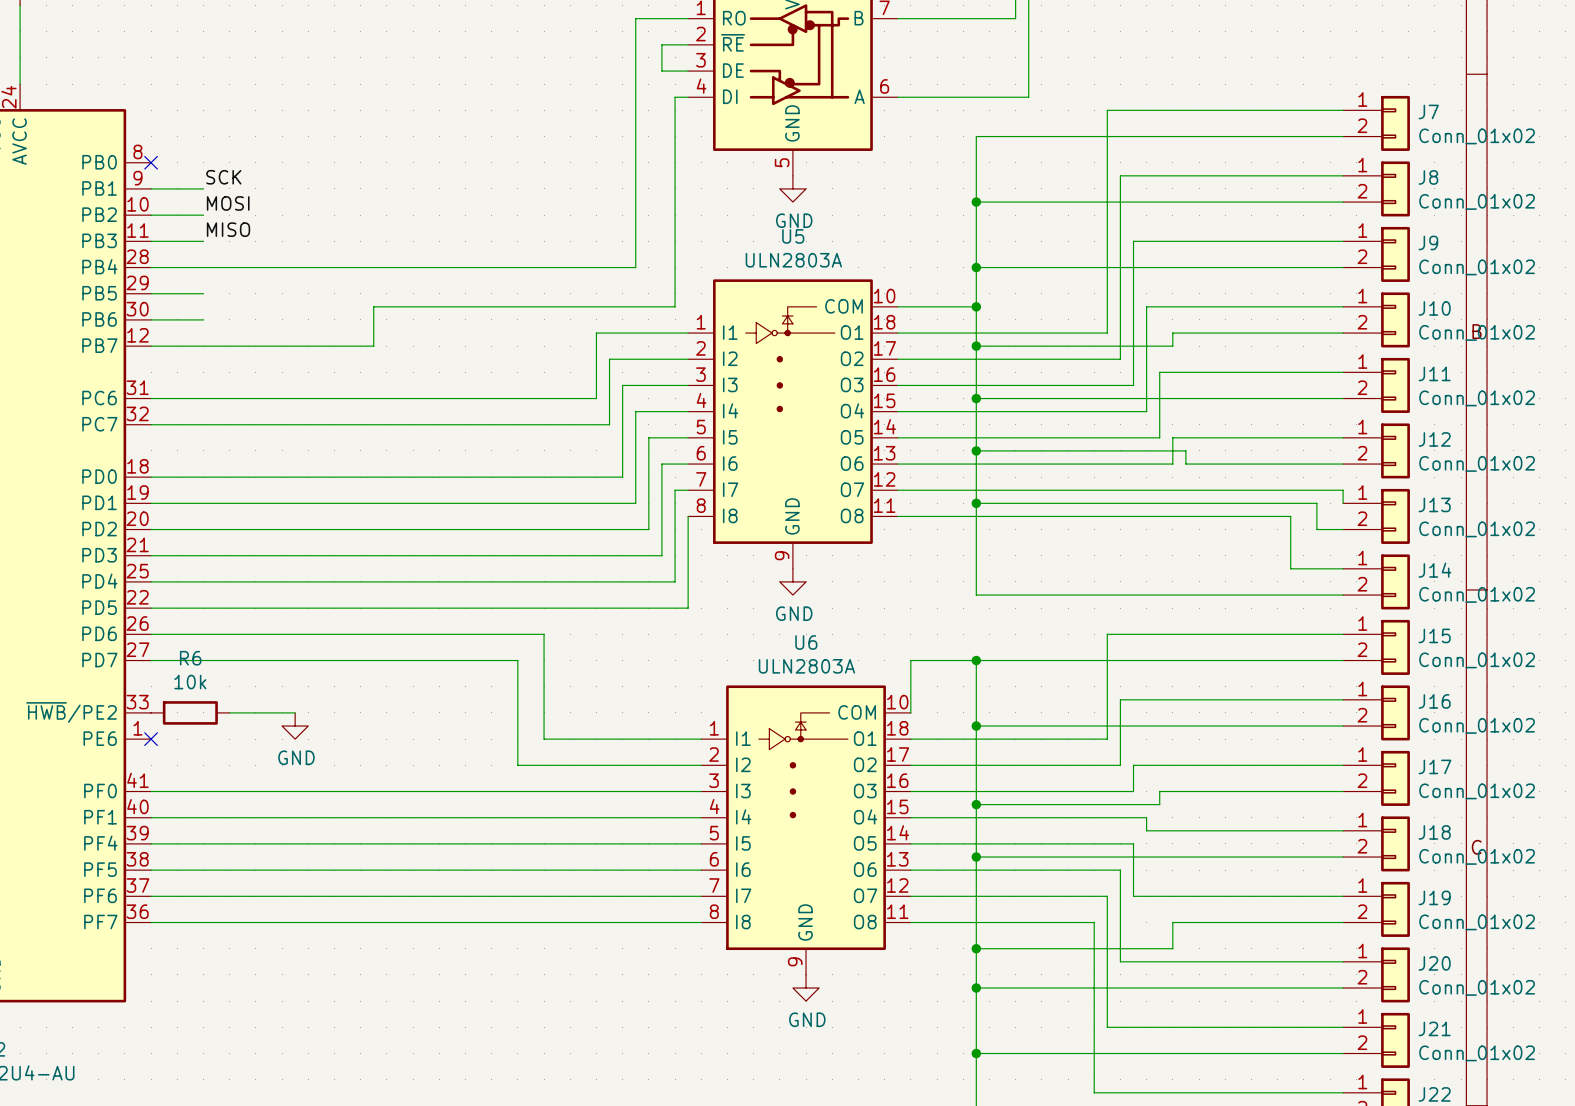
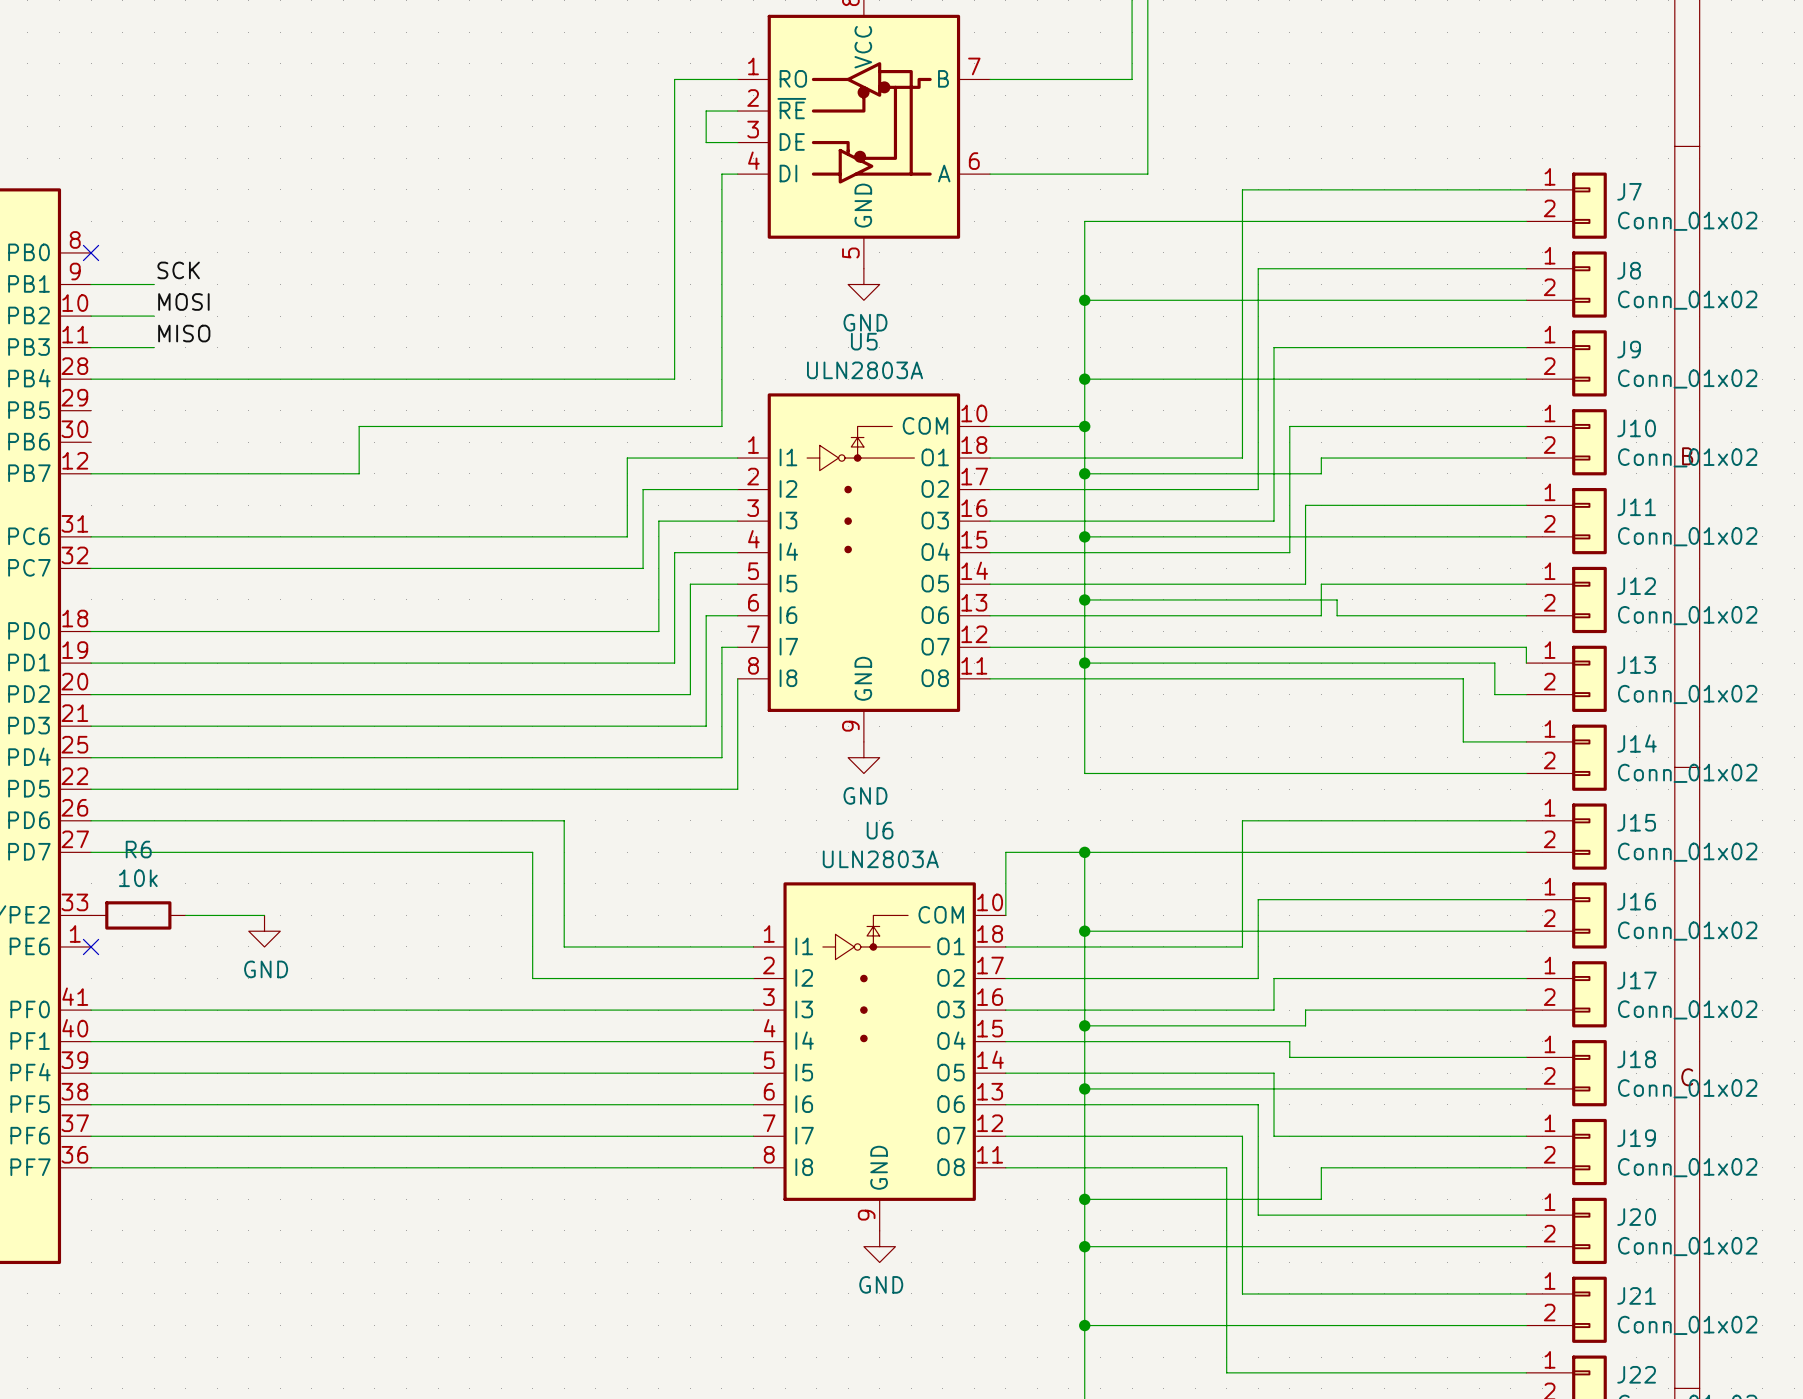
wire: (151, 293) (203, 293) -> none
wire: (151, 319) (203, 319) -> none

